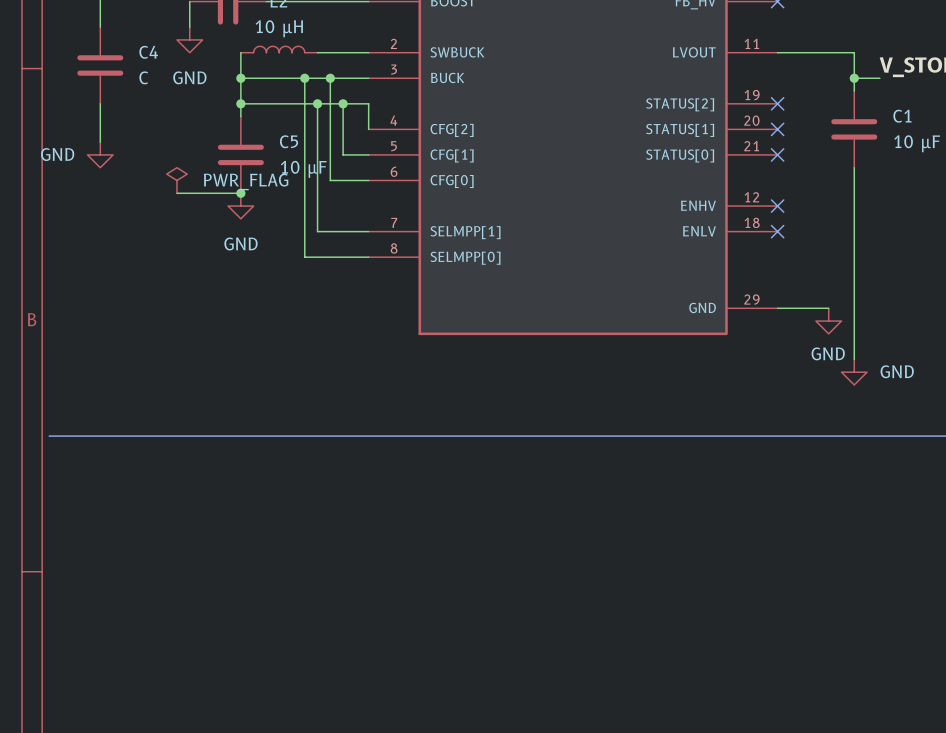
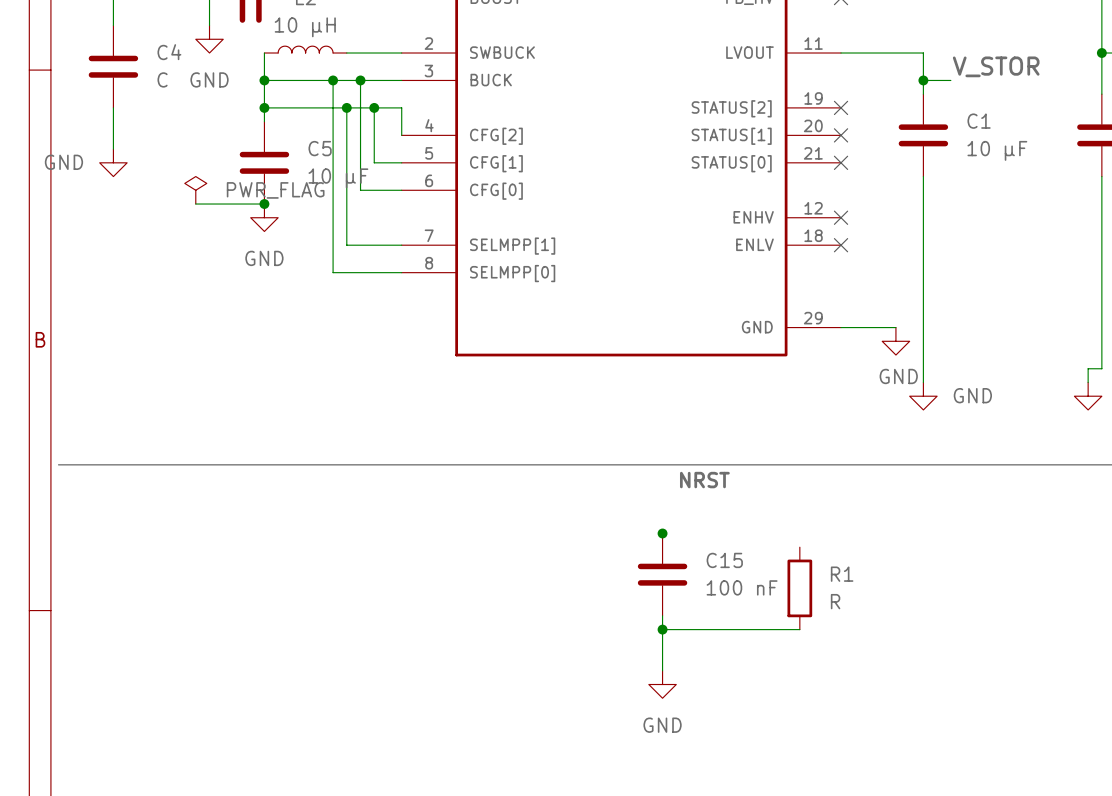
label: none -> NRST (704, 480)
junction: none -> (662, 533)
C15: none -> 100 nF (662, 574)
R1: none -> R (799, 588)
wire: none -> (662, 615) (662, 670)
wire: none -> (662, 629) (799, 629)
junction: none -> (662, 629)
power symbol: none -> GND (662, 684)

